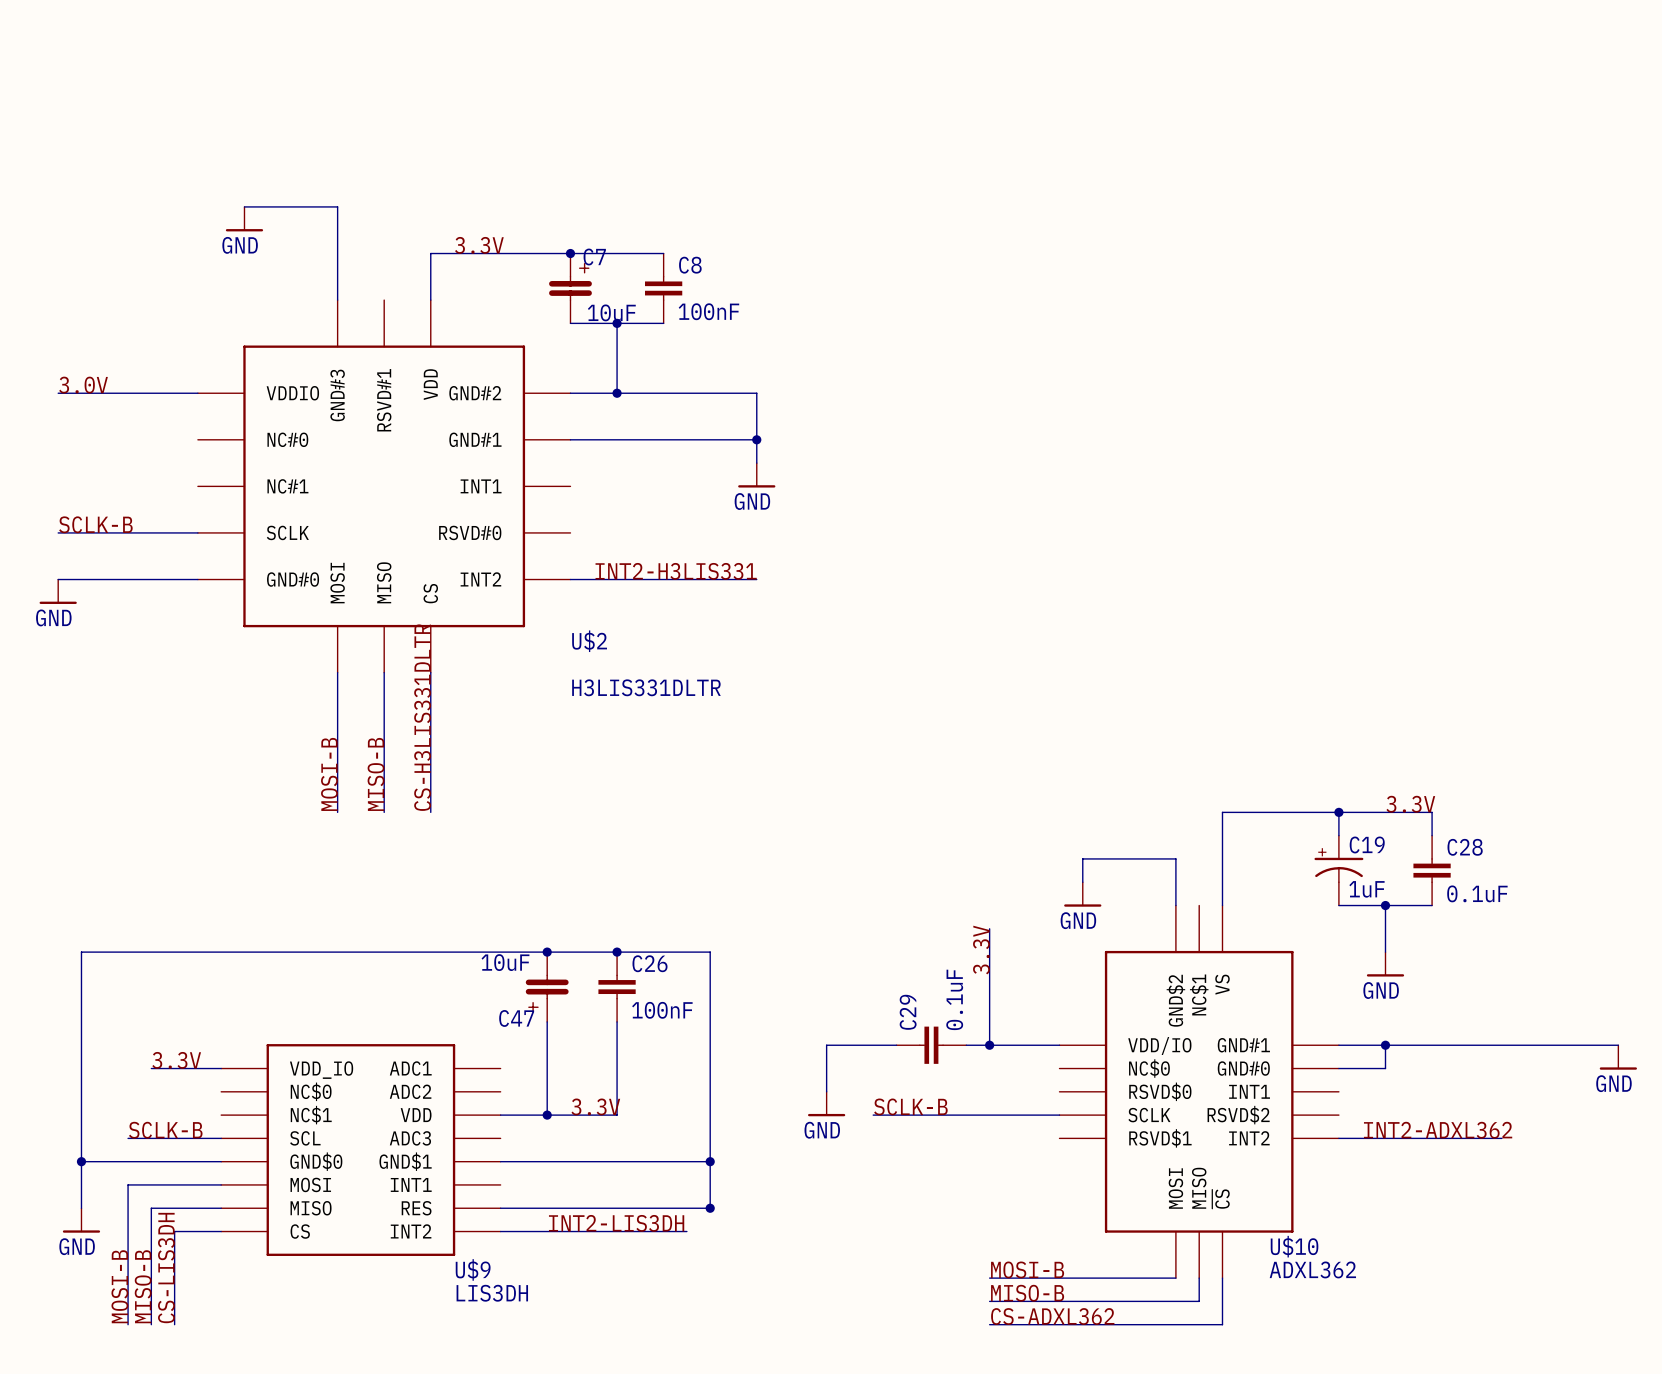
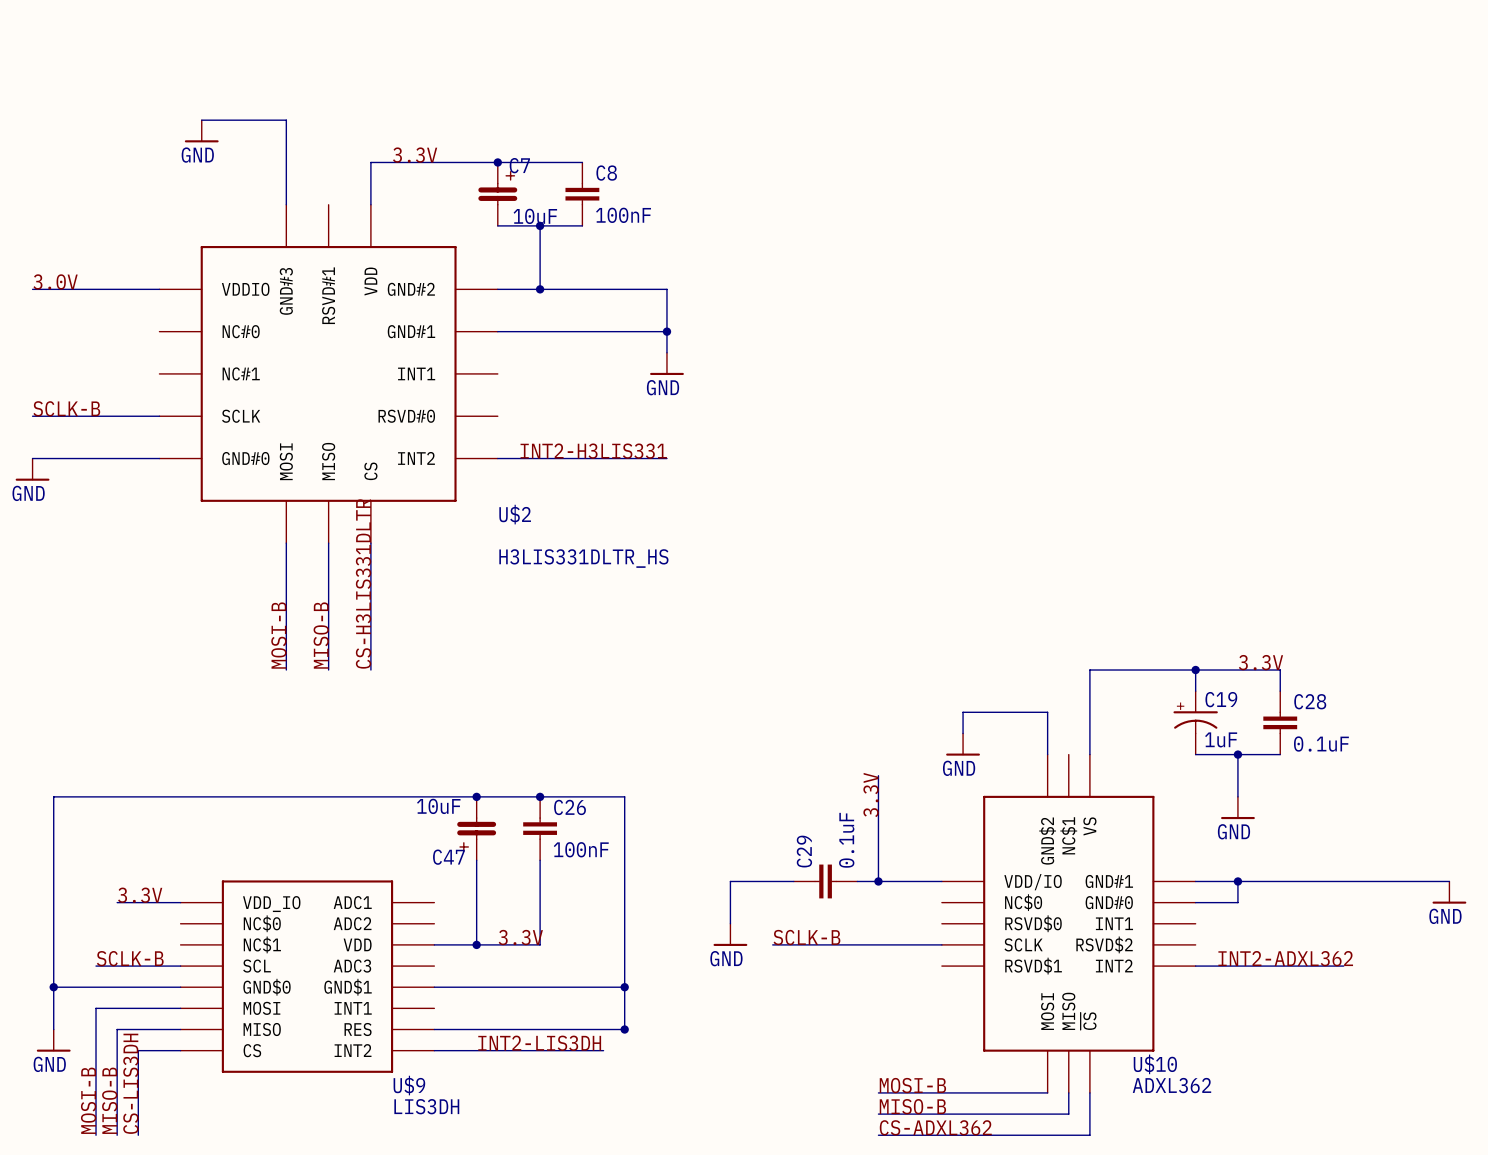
U$2 value: H3LIS331DLTR (646, 687) -> H3LIS331DLTR_HS (583, 558)

